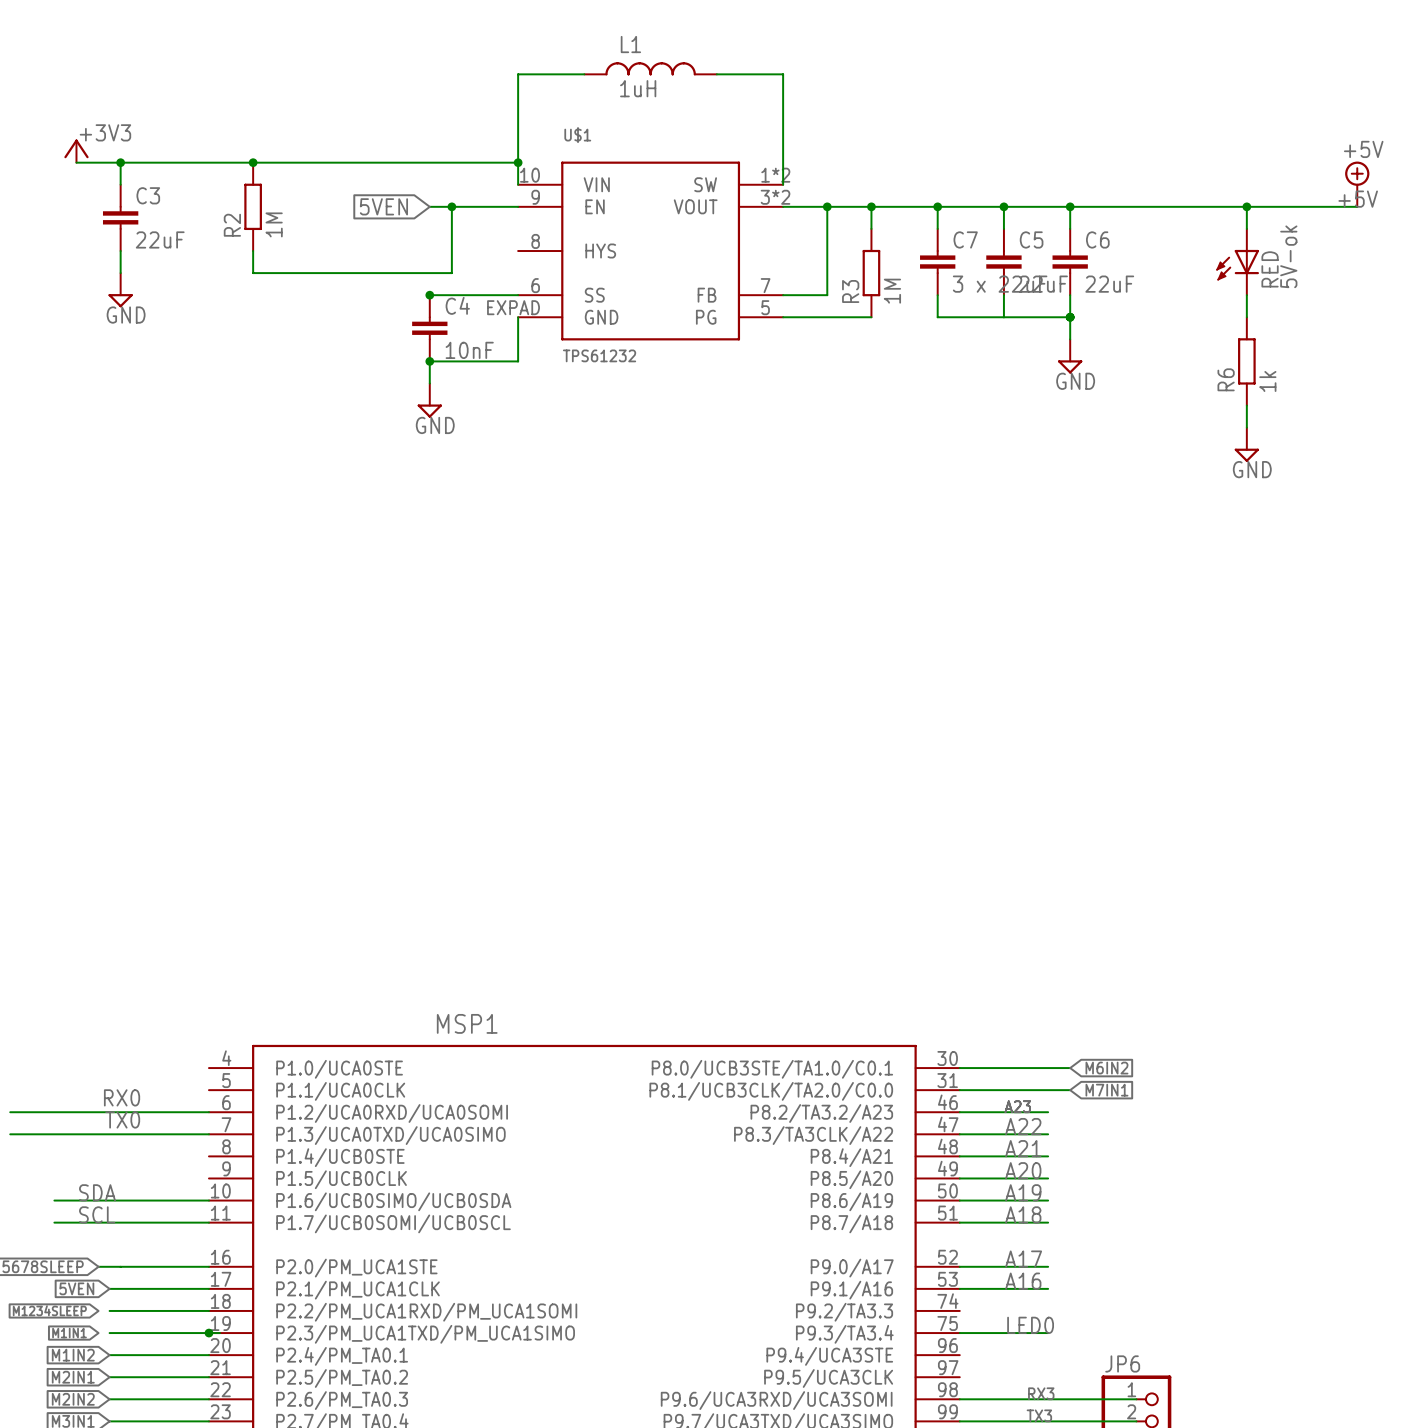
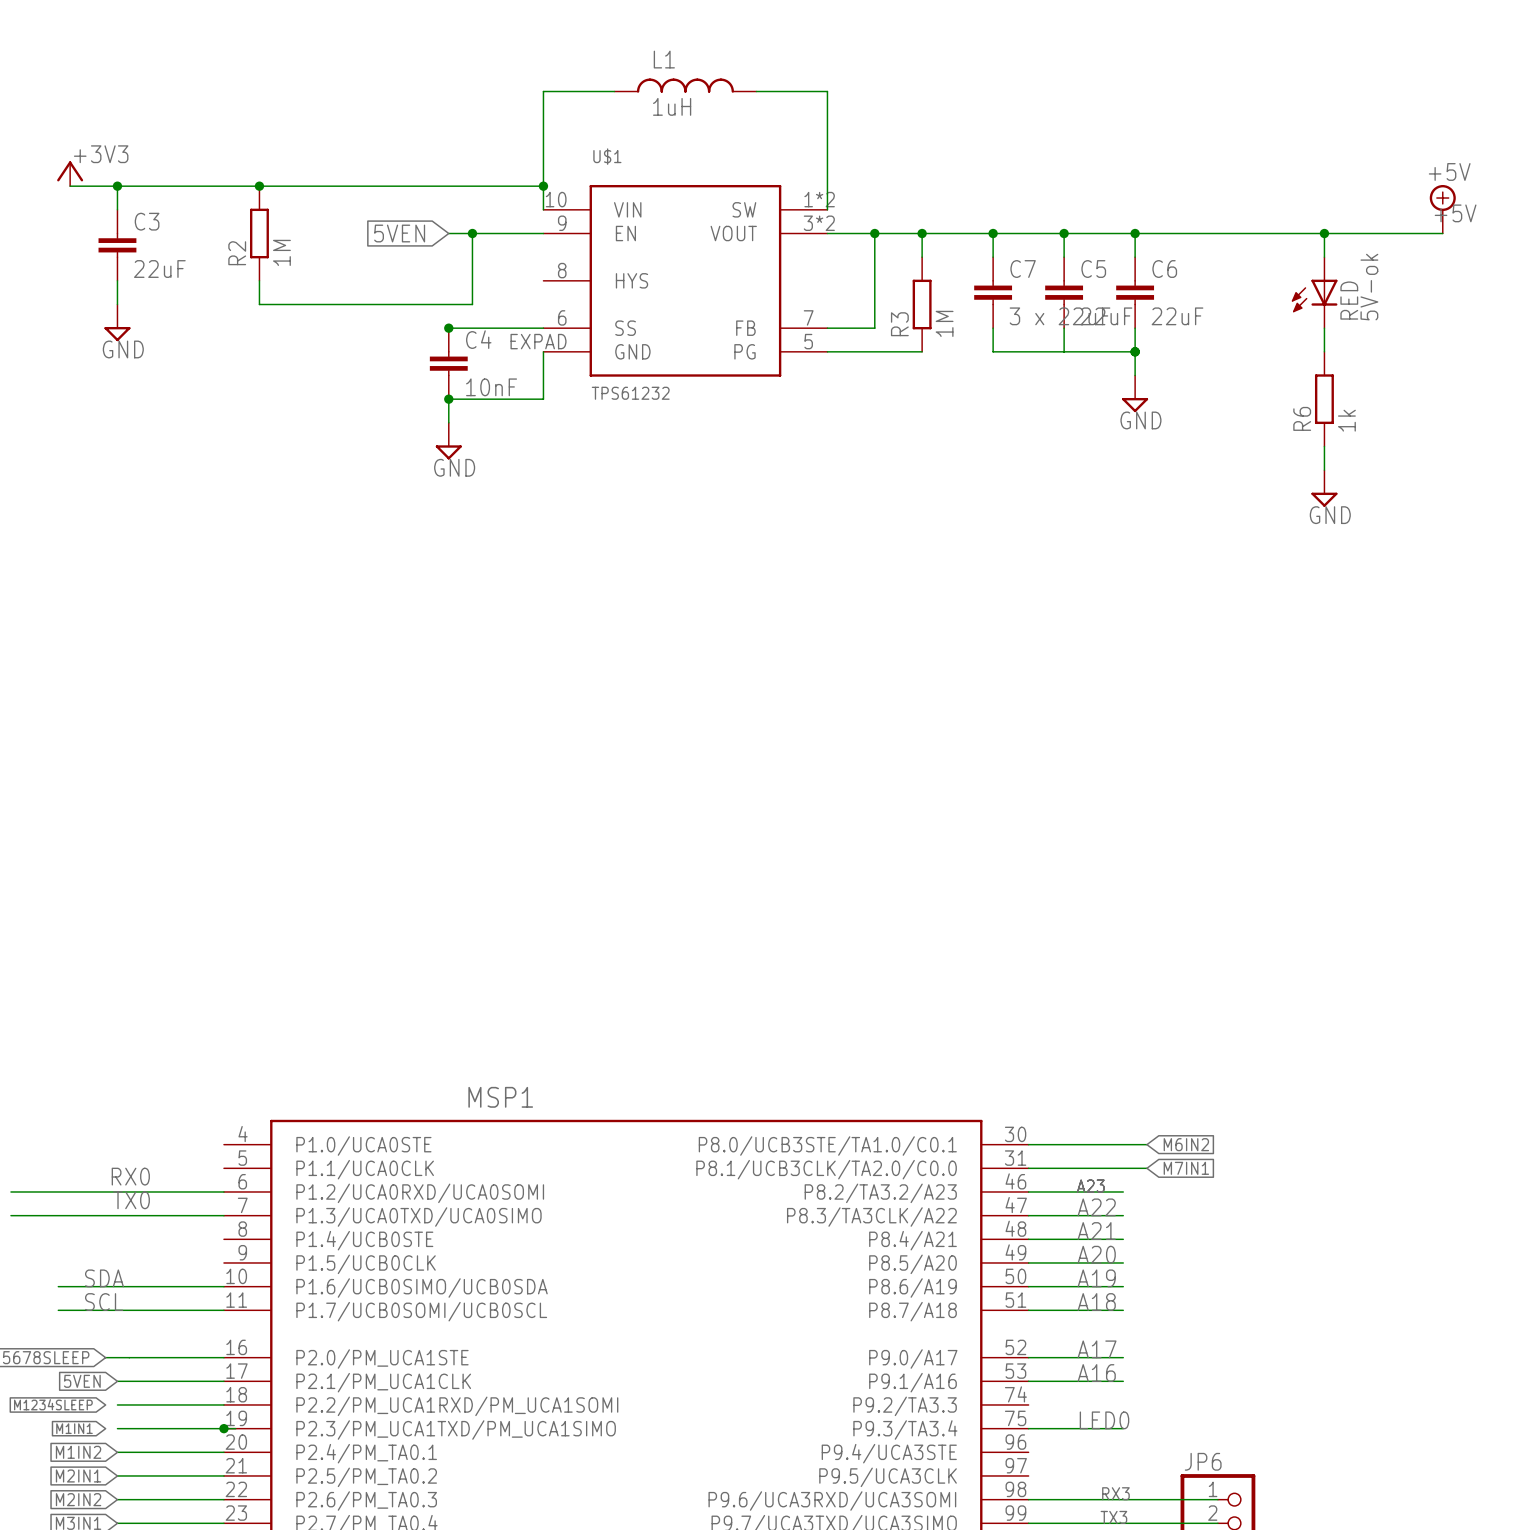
L1 position: (650, 68) -> (685, 85)
wire: (584, 74) (518, 74) (518, 184) -> (614, 91) (543, 91) (543, 209)
wire: (716, 74) (783, 74) (783, 184) -> (756, 91) (827, 91) (827, 209)
power symbol position: +3V3 (76, 151) -> +3V3 (70, 173)
wire: (76, 162) (518, 162) -> (70, 186) (543, 186)
wire: (120, 162) (120, 184) -> (117, 186) (117, 209)
junction position: (120, 162) -> (117, 186)
junction position: (253, 162) -> (259, 186)
junction position: (518, 162) -> (543, 186)
power symbol position: +5V (1357, 184) -> +5V (1442, 209)
R2 position: (253, 206) -> (259, 233)
global label position: 5VEN (383, 206) -> 5VEN (399, 233)
wire: (429, 206) (518, 206) -> (448, 233) (543, 233)
wire: (451, 206) (451, 273) (253, 273) (253, 251) -> (472, 233) (472, 304) (259, 304) (259, 280)
junction position: (451, 206) -> (472, 233)
wire: (783, 206) (1357, 206) -> (827, 233) (1442, 233)
wire: (827, 206) (827, 295) (783, 295) -> (874, 233) (874, 328) (827, 328)
junction position: (827, 206) -> (874, 233)
wire: (871, 206) (871, 228) -> (922, 233) (922, 257)
junction position: (871, 206) -> (922, 233)
wire: (937, 206) (937, 228) -> (993, 233) (993, 257)
junction position: (937, 206) -> (993, 233)
wire: (1003, 206) (1003, 228) -> (1064, 233) (1064, 257)
junction position: (1003, 206) -> (1064, 233)
wire: (1070, 206) (1070, 228) -> (1135, 233) (1135, 257)
junction position: (1070, 206) -> (1135, 233)
wire: (1246, 206) (1246, 228) -> (1324, 233) (1324, 257)
junction position: (1246, 206) -> (1324, 233)
C3 position: (120, 217) -> (117, 245)
wire: (120, 251) (120, 273) -> (117, 280) (117, 304)
U$1 position: (650, 251) -> (685, 280)
C7 position: (937, 262) -> (993, 292)
C5 position: (1003, 262) -> (1064, 292)
C6 position: (1070, 262) -> (1135, 292)
RED position: (1237, 262) -> (1314, 292)
R3 position: (871, 273) -> (922, 304)
power symbol position: GND (120, 290) -> GND (117, 322)
wire: (429, 295) (518, 295) -> (448, 328) (543, 328)
junction position: (429, 295) -> (448, 328)
wire: (937, 295) (937, 317) (1070, 317) -> (993, 328) (993, 351) (1135, 351)
wire: (1003, 295) (1003, 317) -> (1064, 328) (1064, 351)
wire: (1070, 295) (1070, 339) -> (1135, 328) (1135, 375)
wire: (1246, 295) (1246, 317) -> (1324, 328) (1324, 351)
wire: (518, 317) (518, 361) (429, 361) (429, 383) -> (543, 351) (543, 399) (448, 399) (448, 422)
wire: (783, 317) (871, 317) -> (827, 351) (922, 351)
junction position: (1070, 317) -> (1135, 351)
C4 position: (429, 328) -> (448, 363)
power symbol position: GND (1070, 356) -> GND (1135, 393)
junction position: (429, 361) -> (448, 399)
R6 position: (1246, 361) -> (1324, 399)
power symbol position: GND (429, 400) -> GND (448, 441)
wire: (1246, 405) (1246, 427) -> (1324, 446) (1324, 470)
power symbol position: GND (1246, 444) -> GND (1324, 488)

